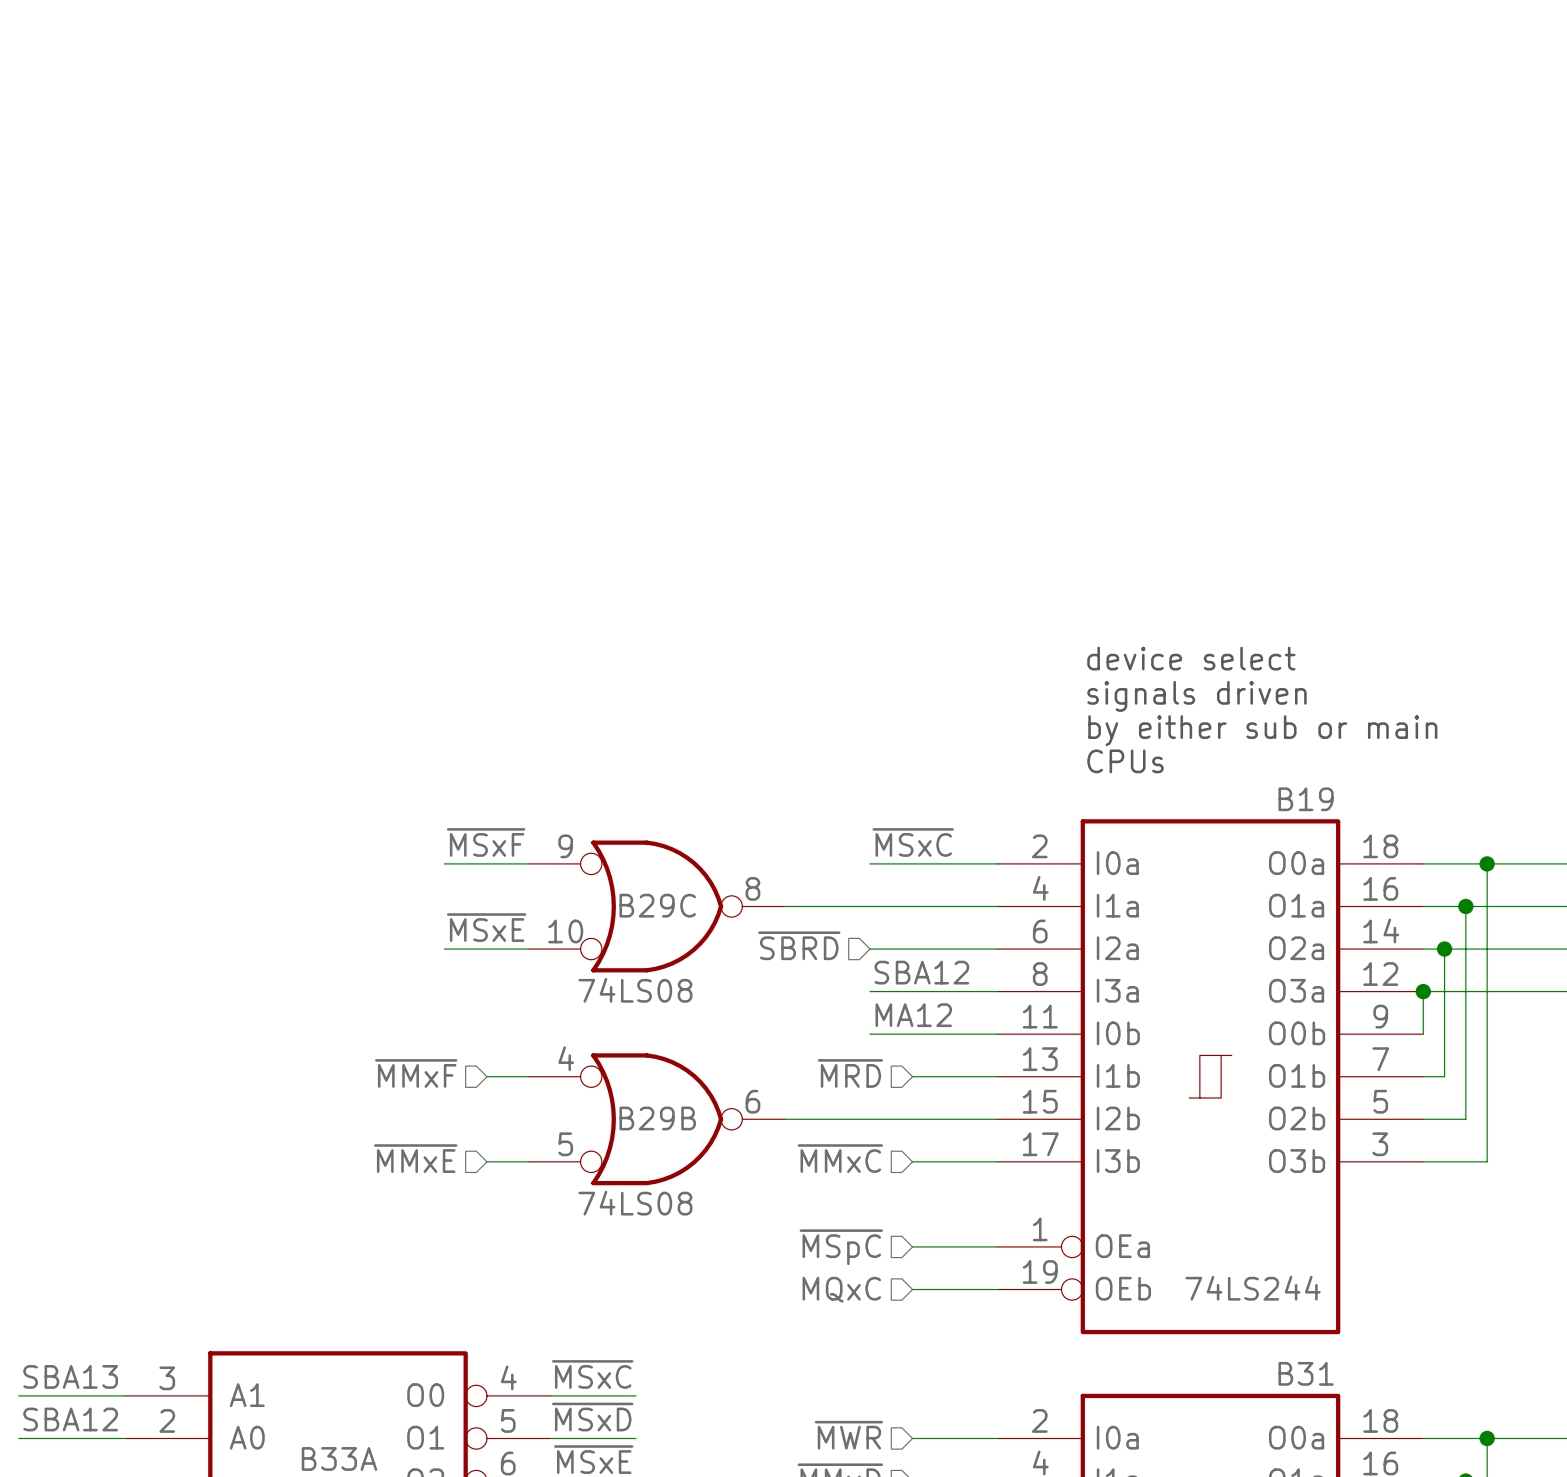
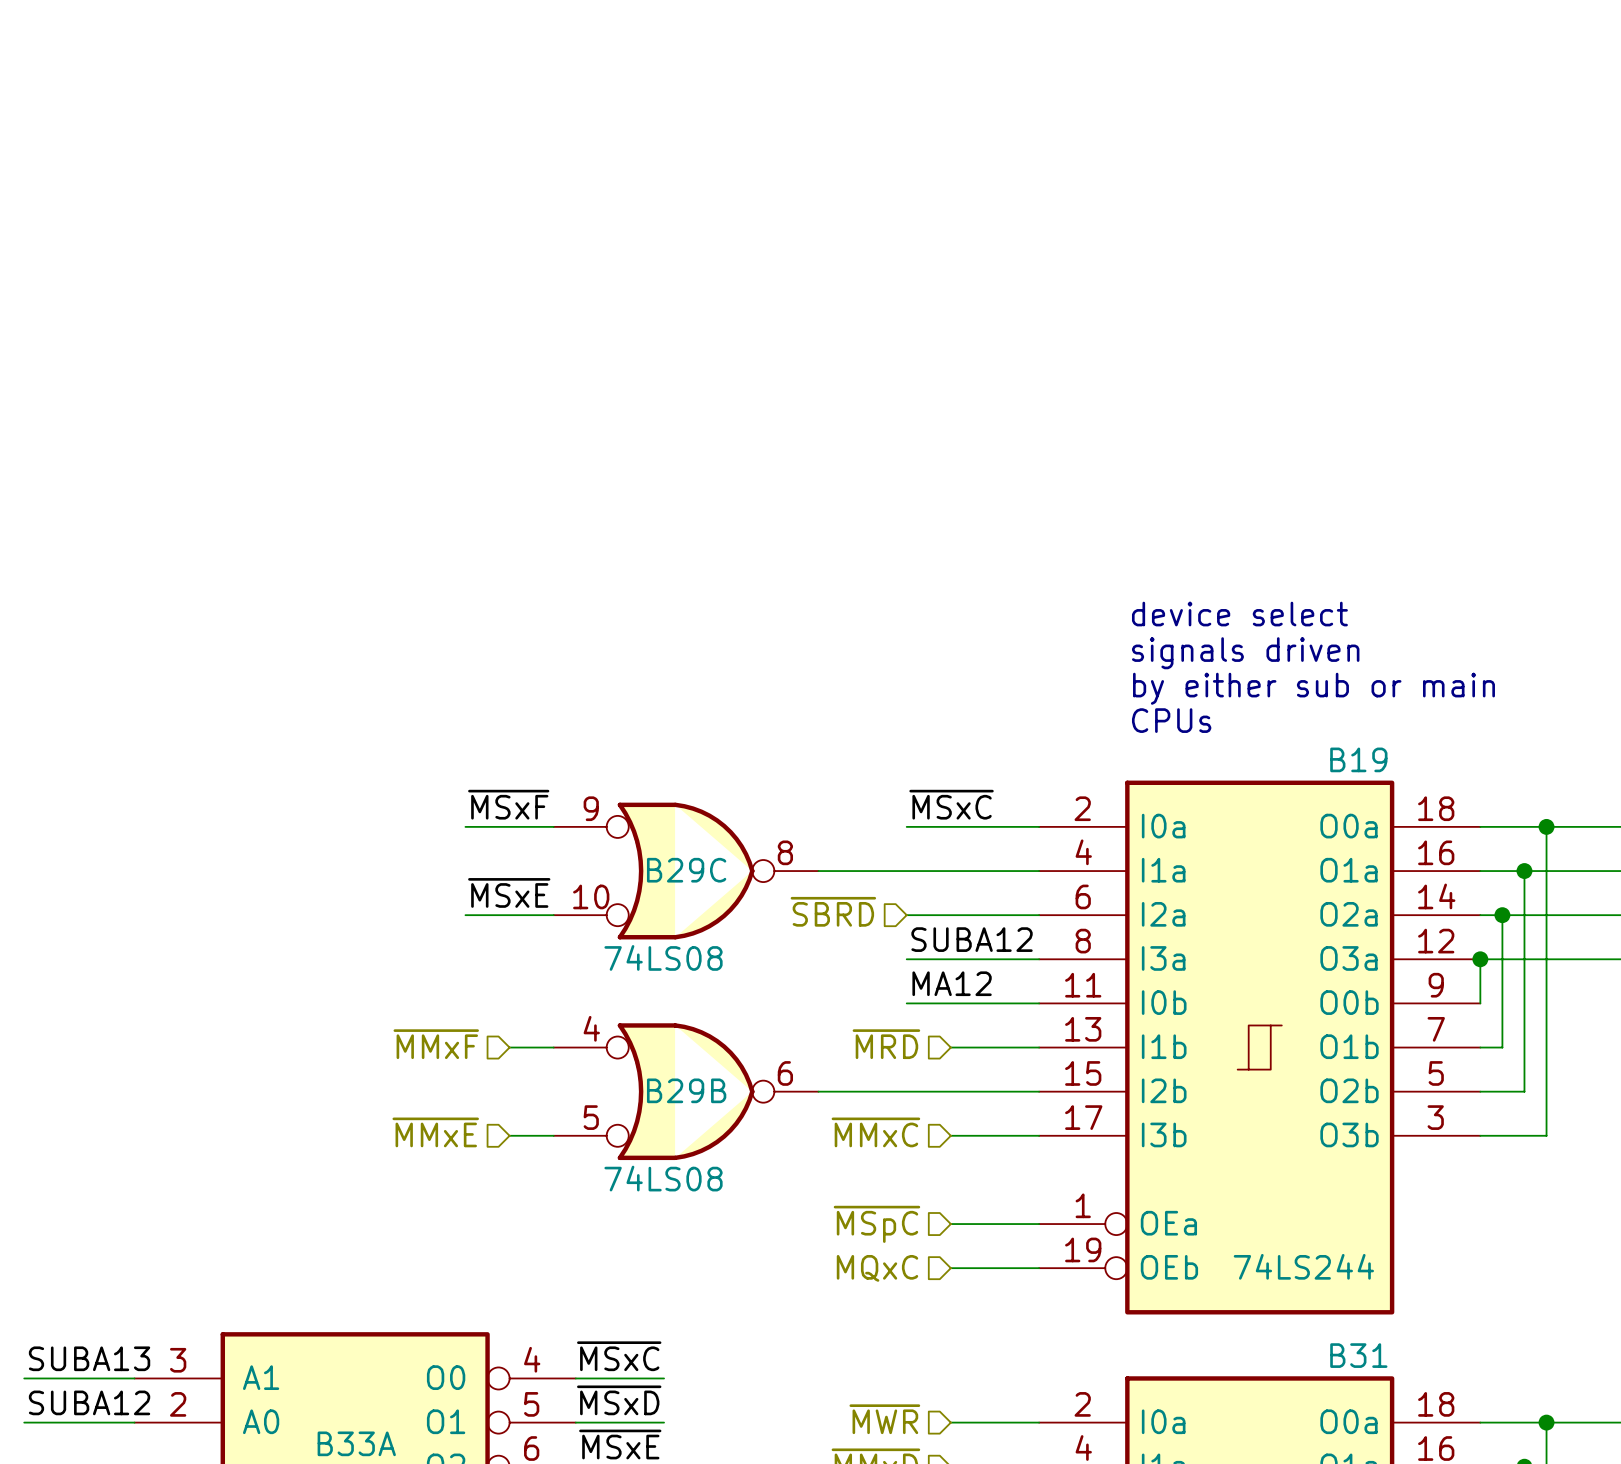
label: SBA12 (921, 972) -> SUBA12 (972, 939)
label: SBA13 (70, 1376) -> SUBA13 (89, 1358)
label: SBA12 (70, 1419) -> SUBA12 (89, 1402)

